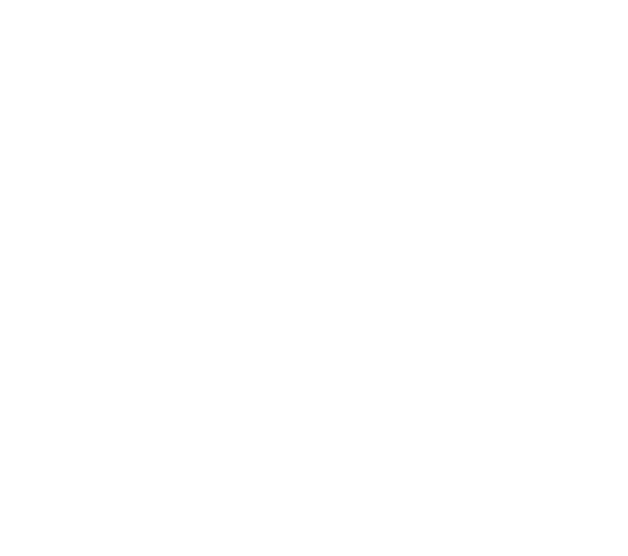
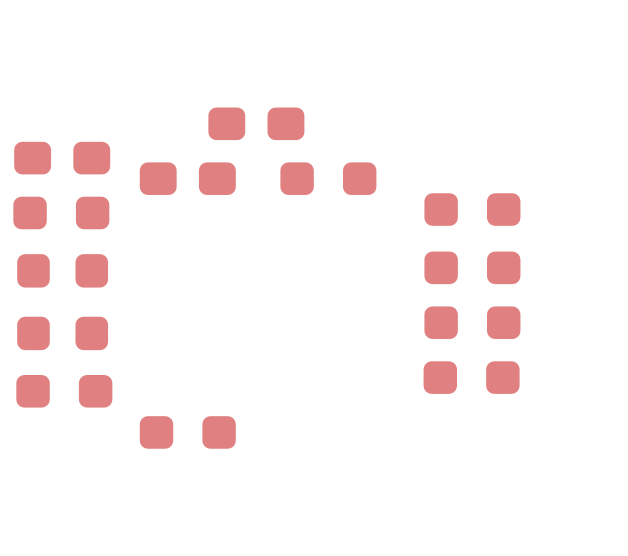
part: none -> (256, 123)
part: none -> (62, 158)
part: none -> (187, 178)
part: none -> (328, 178)
part: none -> (472, 209)
part: none -> (61, 212)
part: none -> (472, 267)
part: none -> (33, 302)
part: none -> (91, 302)
part: none -> (472, 322)
part: none -> (471, 377)
part: none -> (64, 391)
part: none -> (187, 432)

